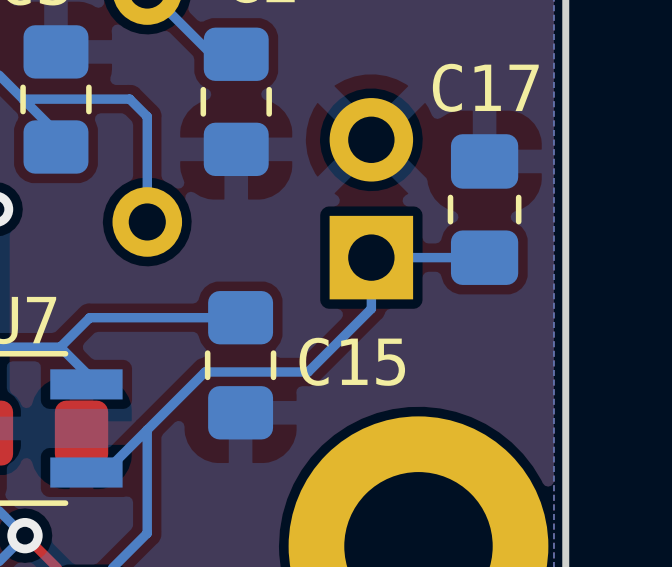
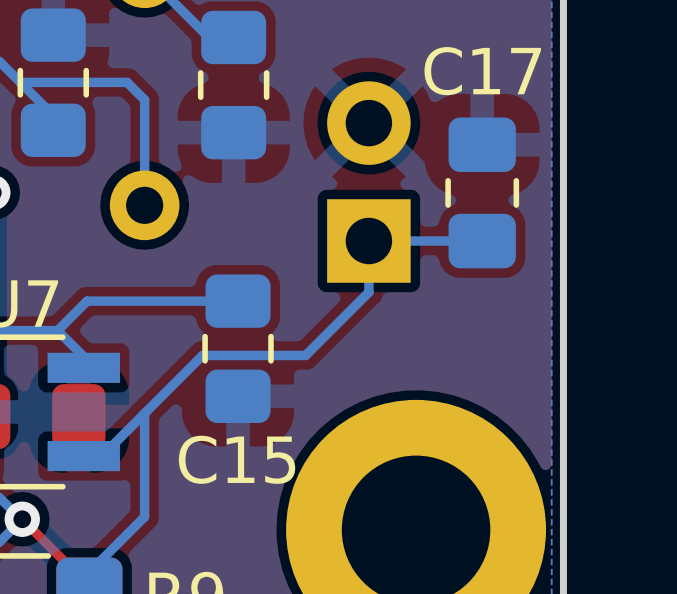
C15 name position: C15 (352, 361) -> C15 (237, 459)

